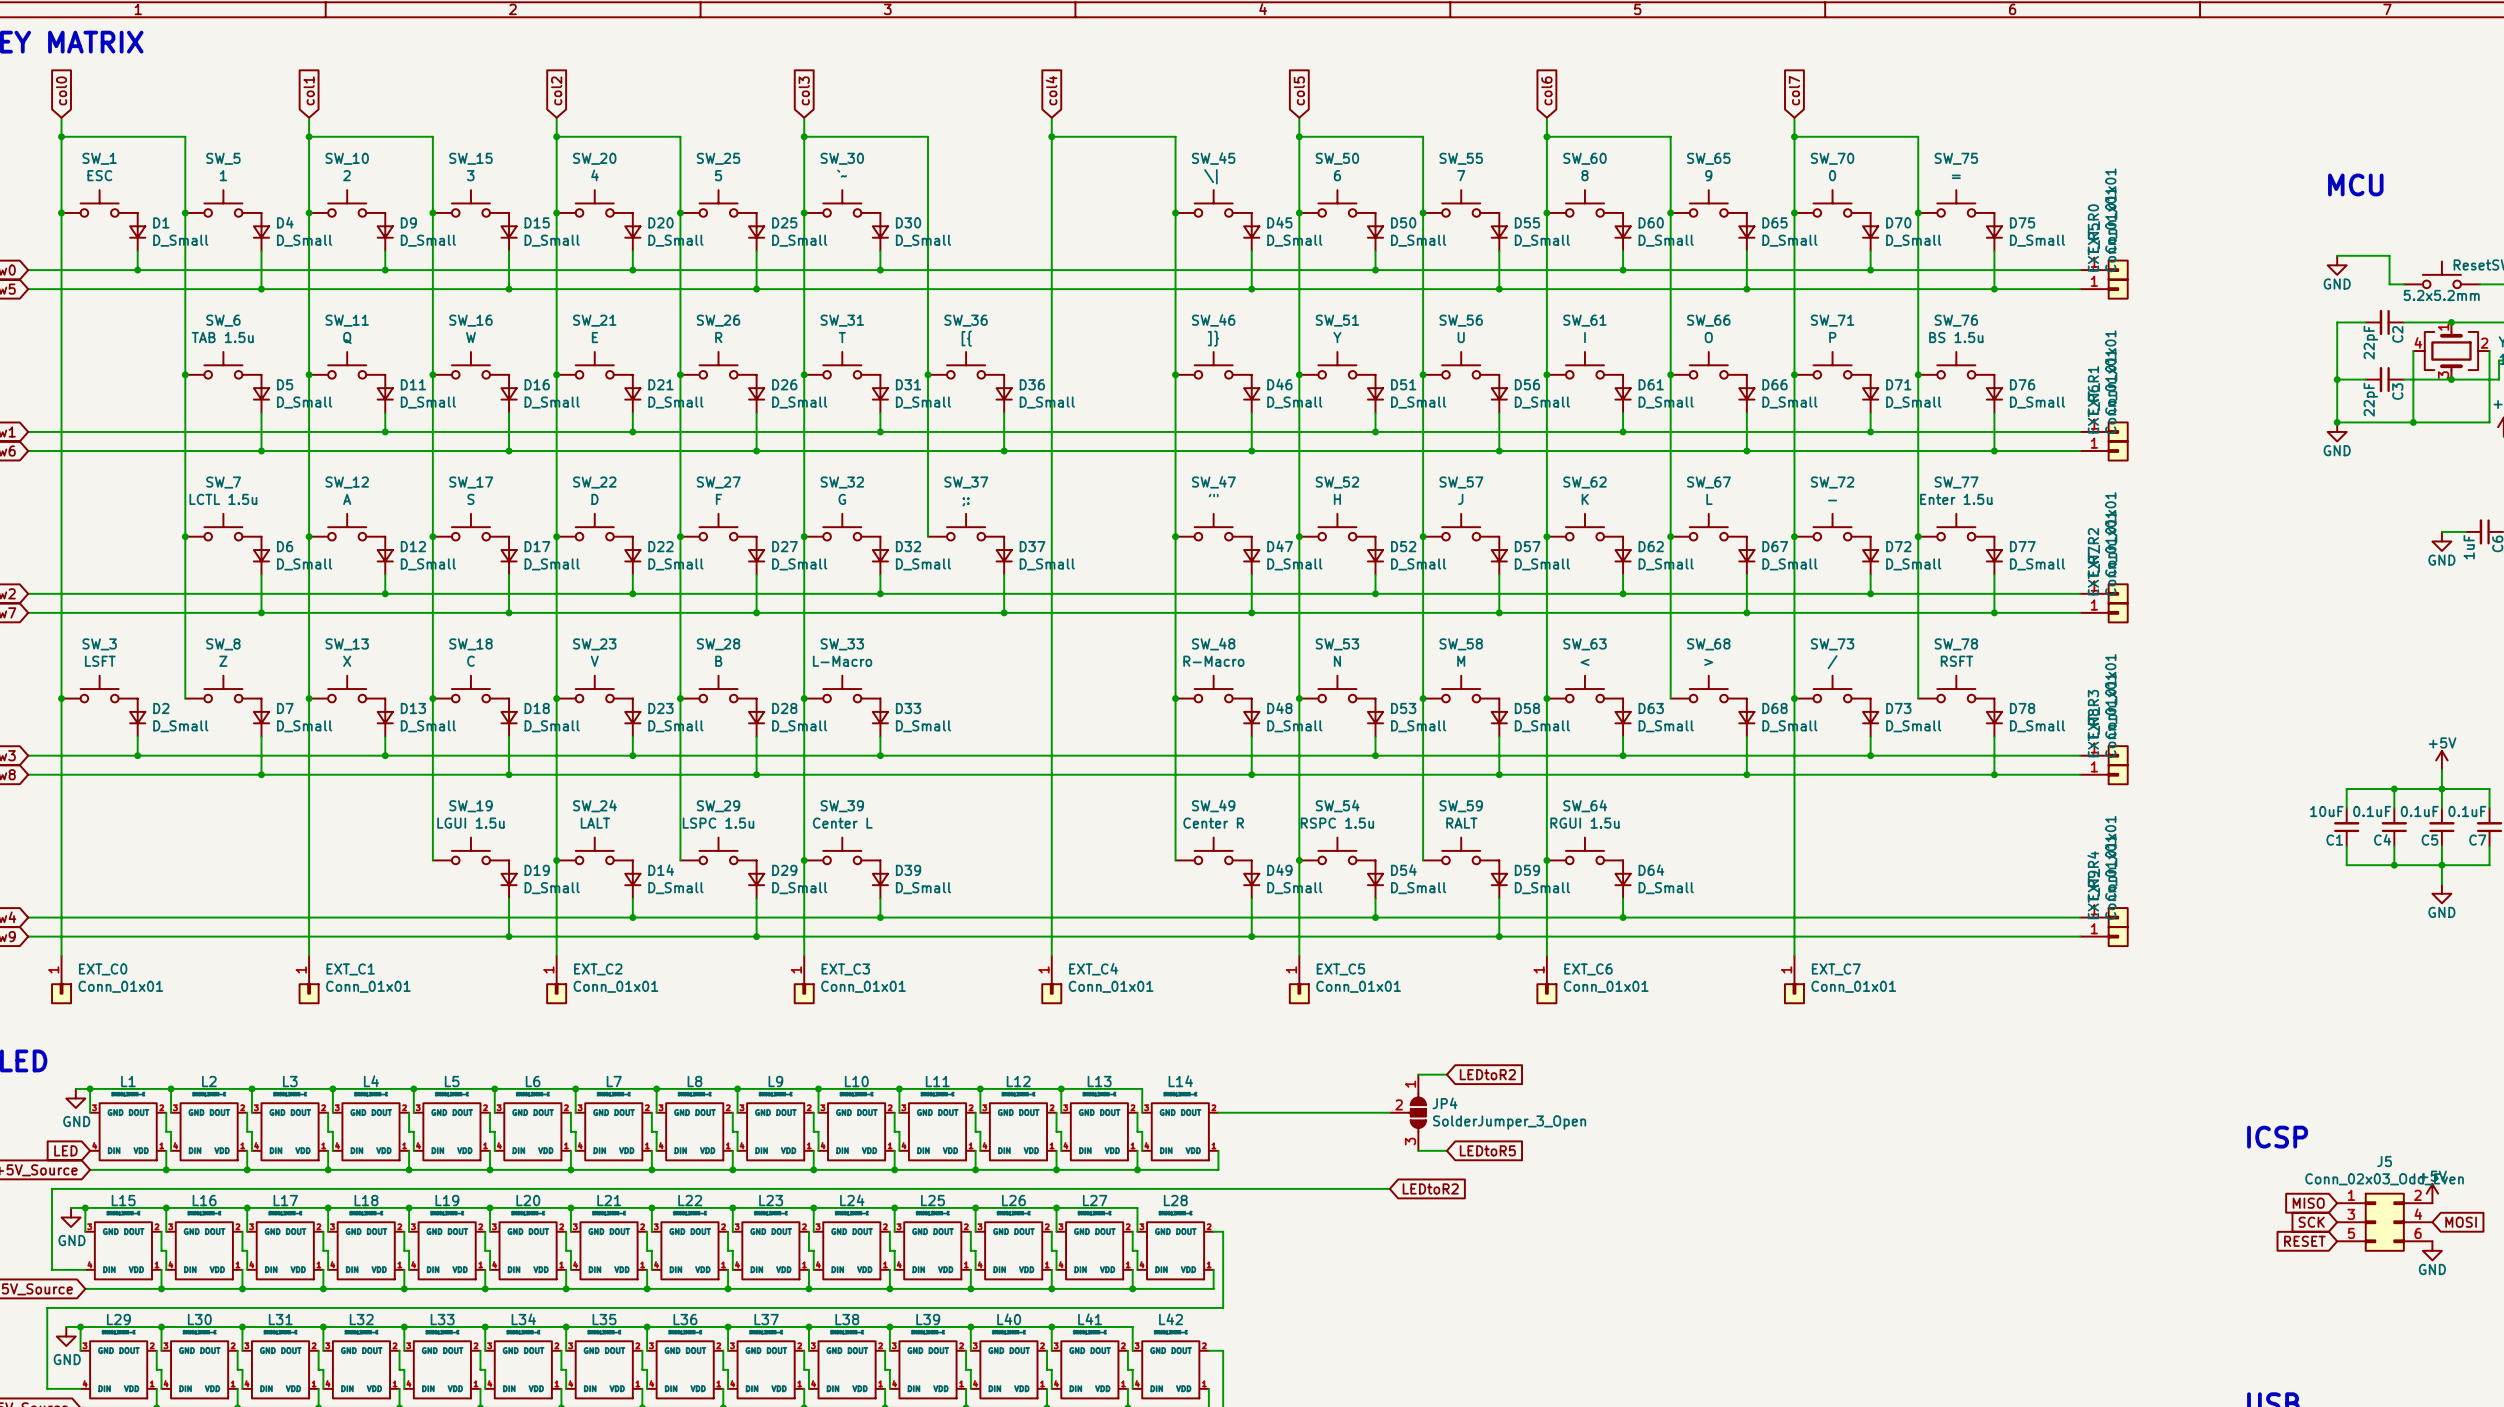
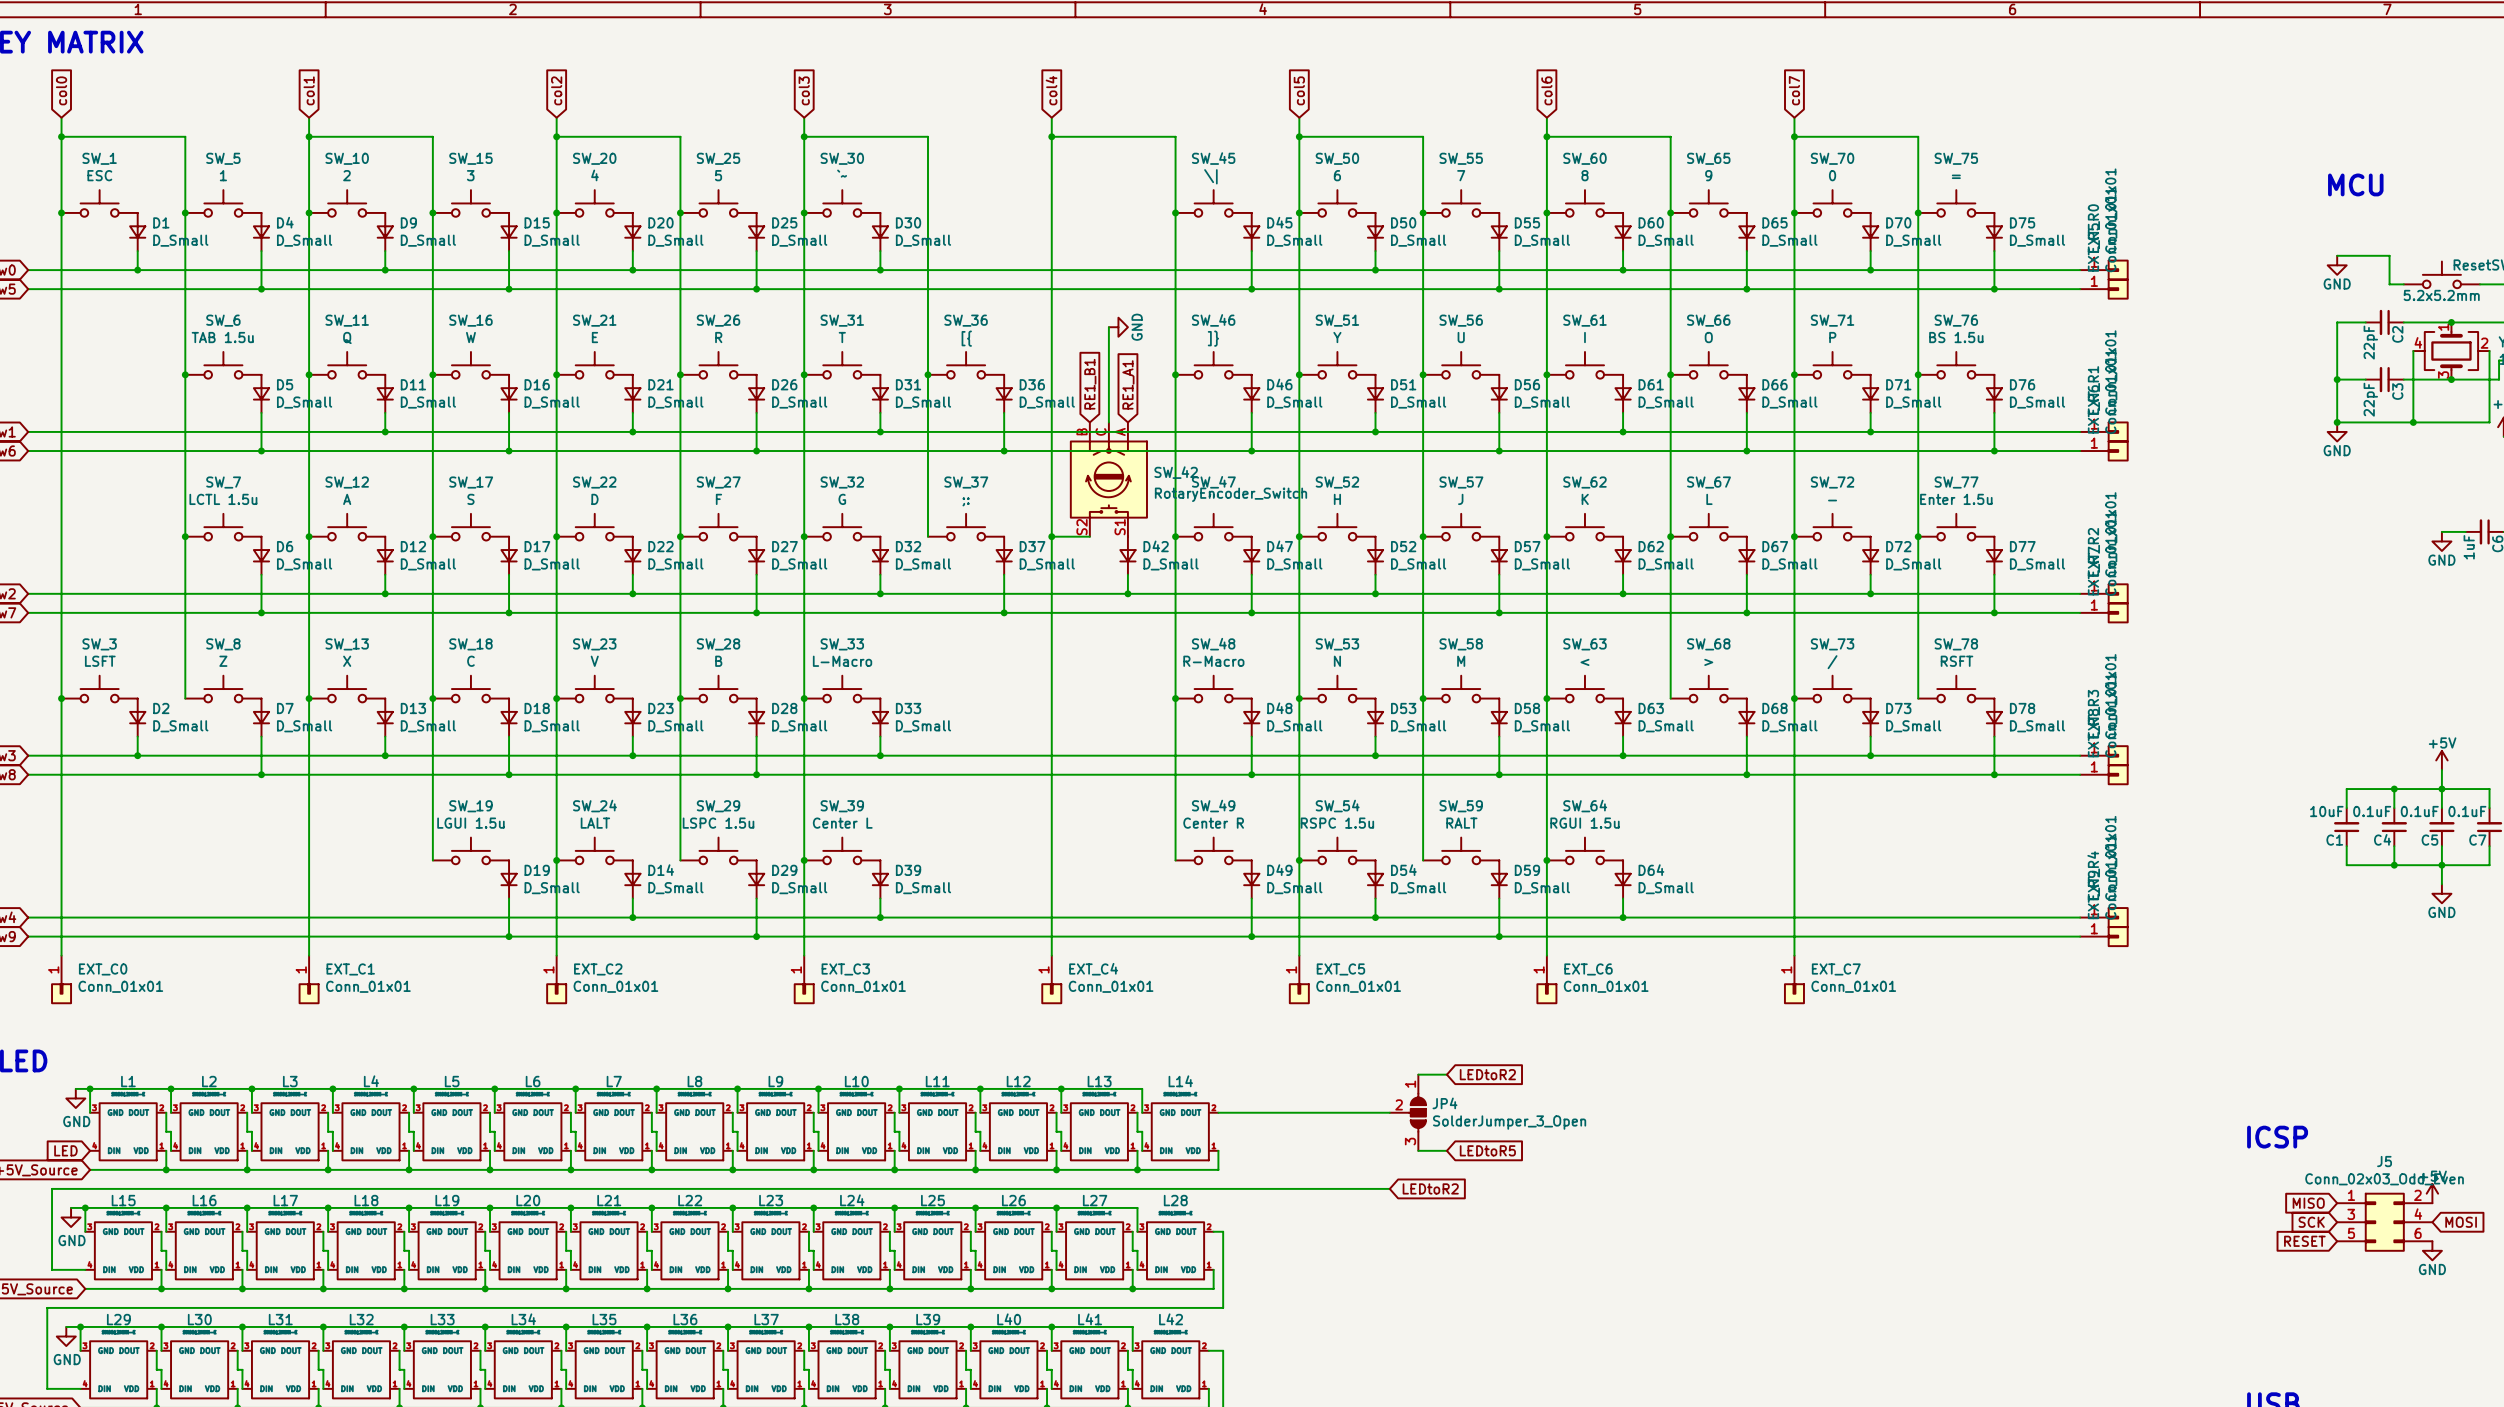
wire: none -> (1108, 327) (1108, 422)
power symbol: none -> GND (1118, 327)
global label: none -> RE1_B1 (1090, 384)
global label: none -> RE1_A1 (1128, 384)
SW_42: none -> RotaryEncoder_Switch (1108, 479)
wire: none -> (1051, 536) (1089, 536)
junction: none -> (1051, 536)
D42: none -> D_Small (1127, 555)
wire: none -> (1127, 574) (1127, 593)
junction: none -> (1127, 593)

